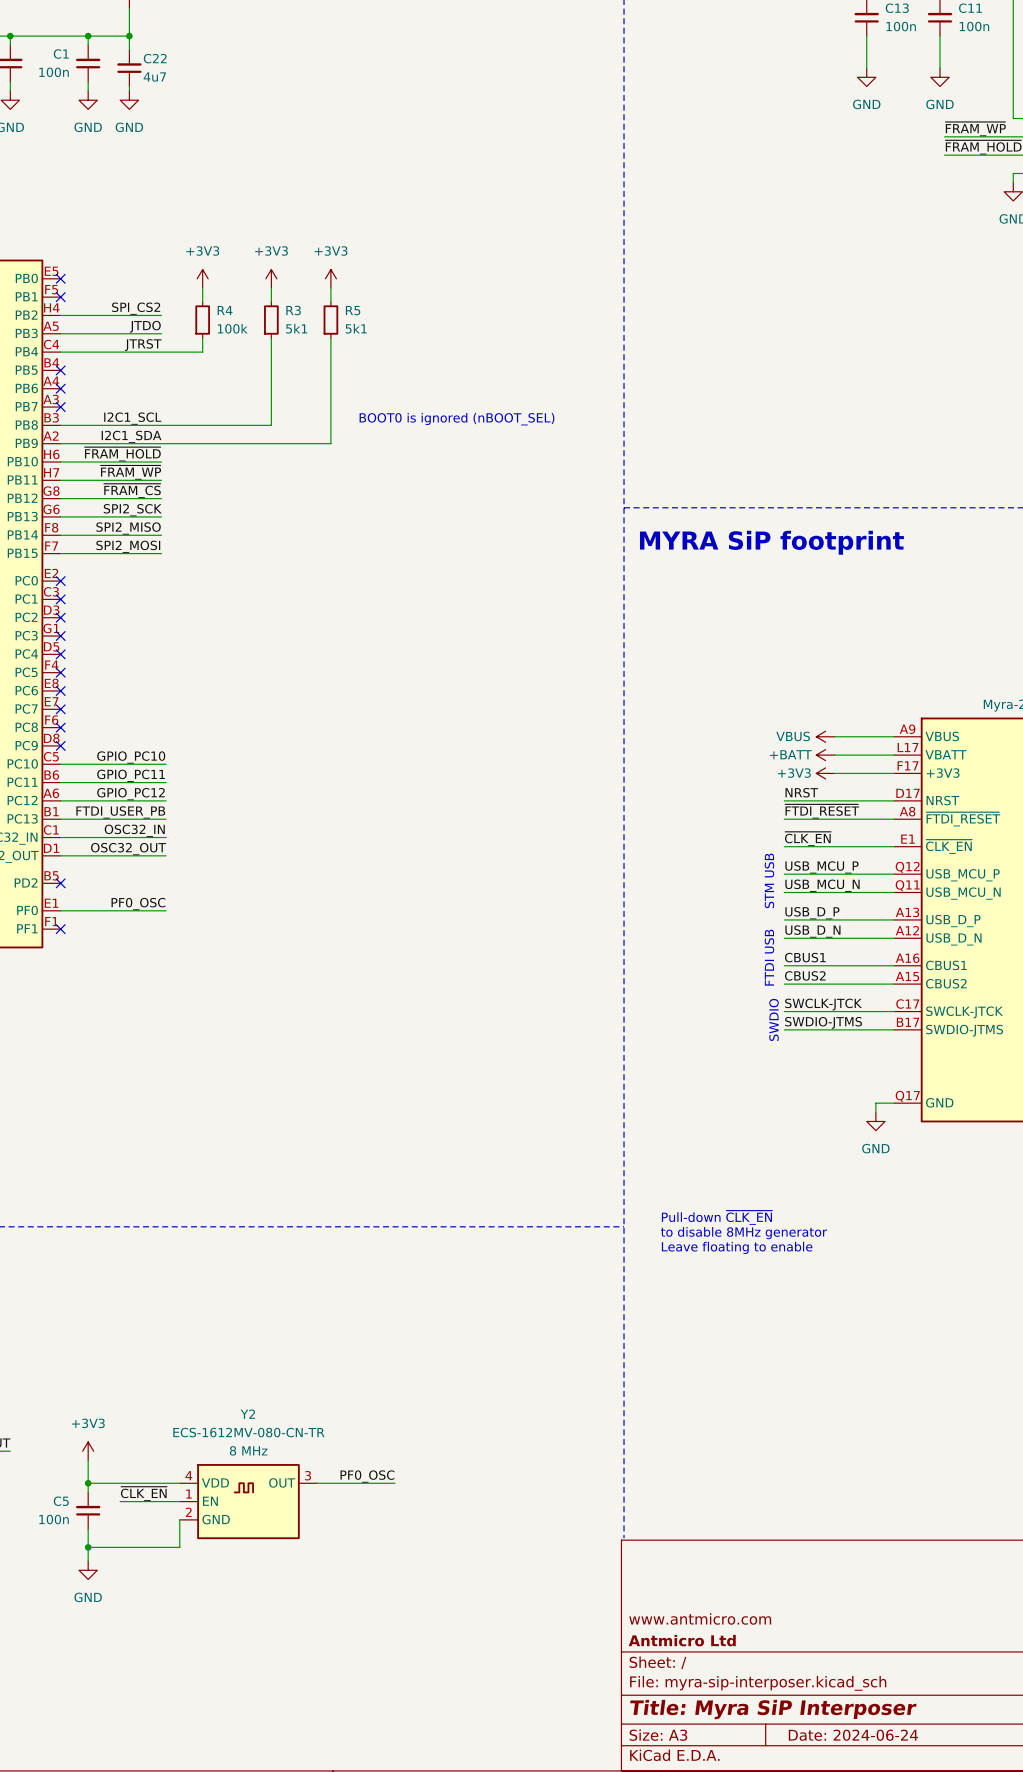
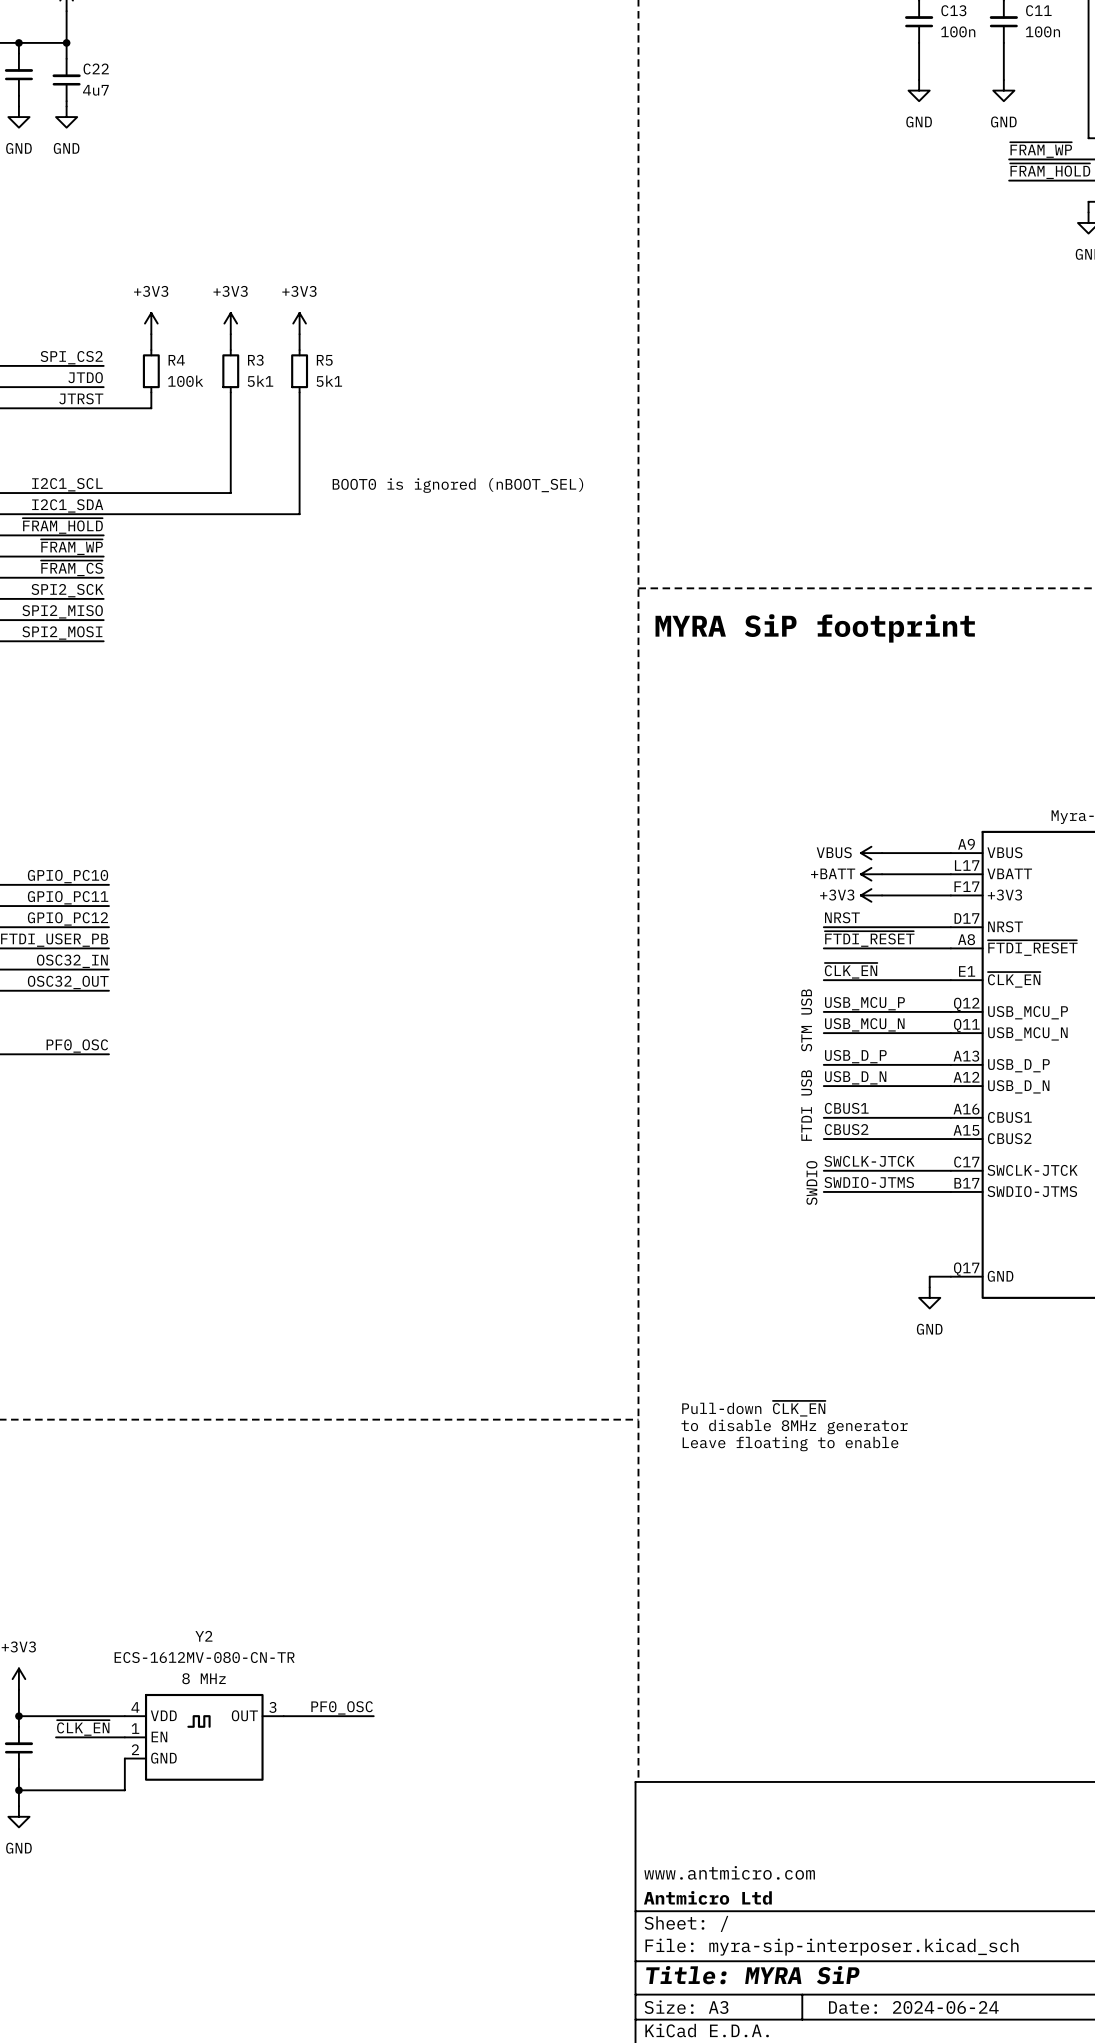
title block: Title: Myra SiP Interposer (773, 1709) -> Title: MYRA SiP (752, 1975)

